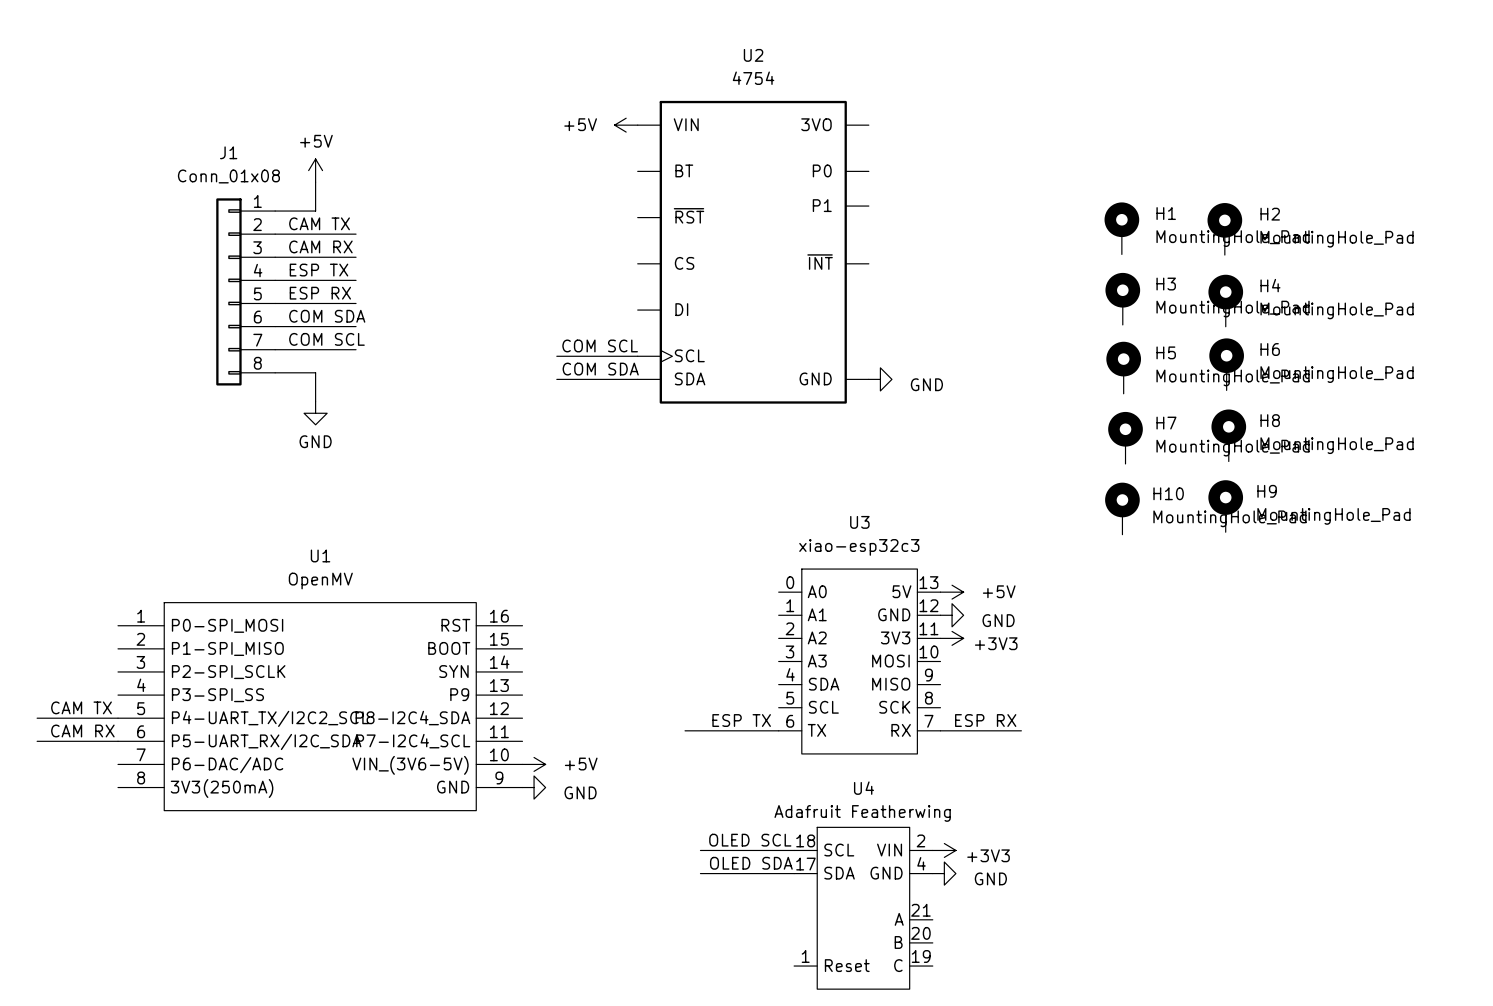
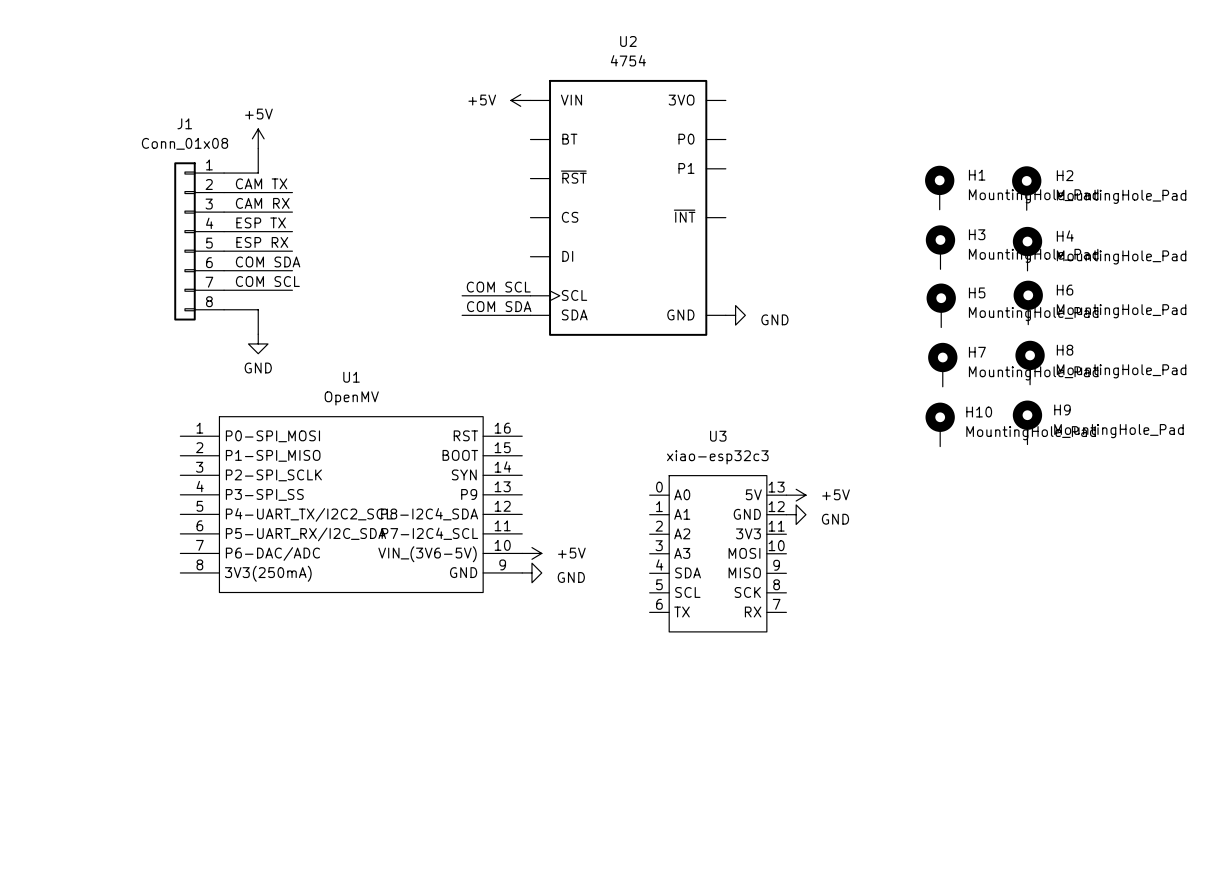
power symbol: +3V3 (952, 638) -> none
U1 position: (320, 706) -> (351, 504)
label: CAM TX (81, 707) -> none
wire: (37, 718) (118, 718) -> none
label: ESP TX (741, 720) -> none
label: ESP RX (985, 720) -> none
label: CAM RX (82, 730) -> none
wire: (685, 730) (778, 730) -> none
wire: (940, 730) (1021, 730) -> none
wire: (37, 741) (118, 741) -> none
power symbol position: +5V (534, 764) -> +5V (531, 553)
power symbol position: GND (534, 787) -> GND (531, 572)
label: OLED SCL (750, 840) -> none
wire: (700, 850) (794, 850) -> none
power symbol: +3V3 (944, 850) -> none
label: OLED SDA (751, 863) -> none
wire: (700, 873) (794, 873) -> none
power symbol: GND (944, 873) -> none
U4: Adafruit Featherwing (863, 908) -> none

